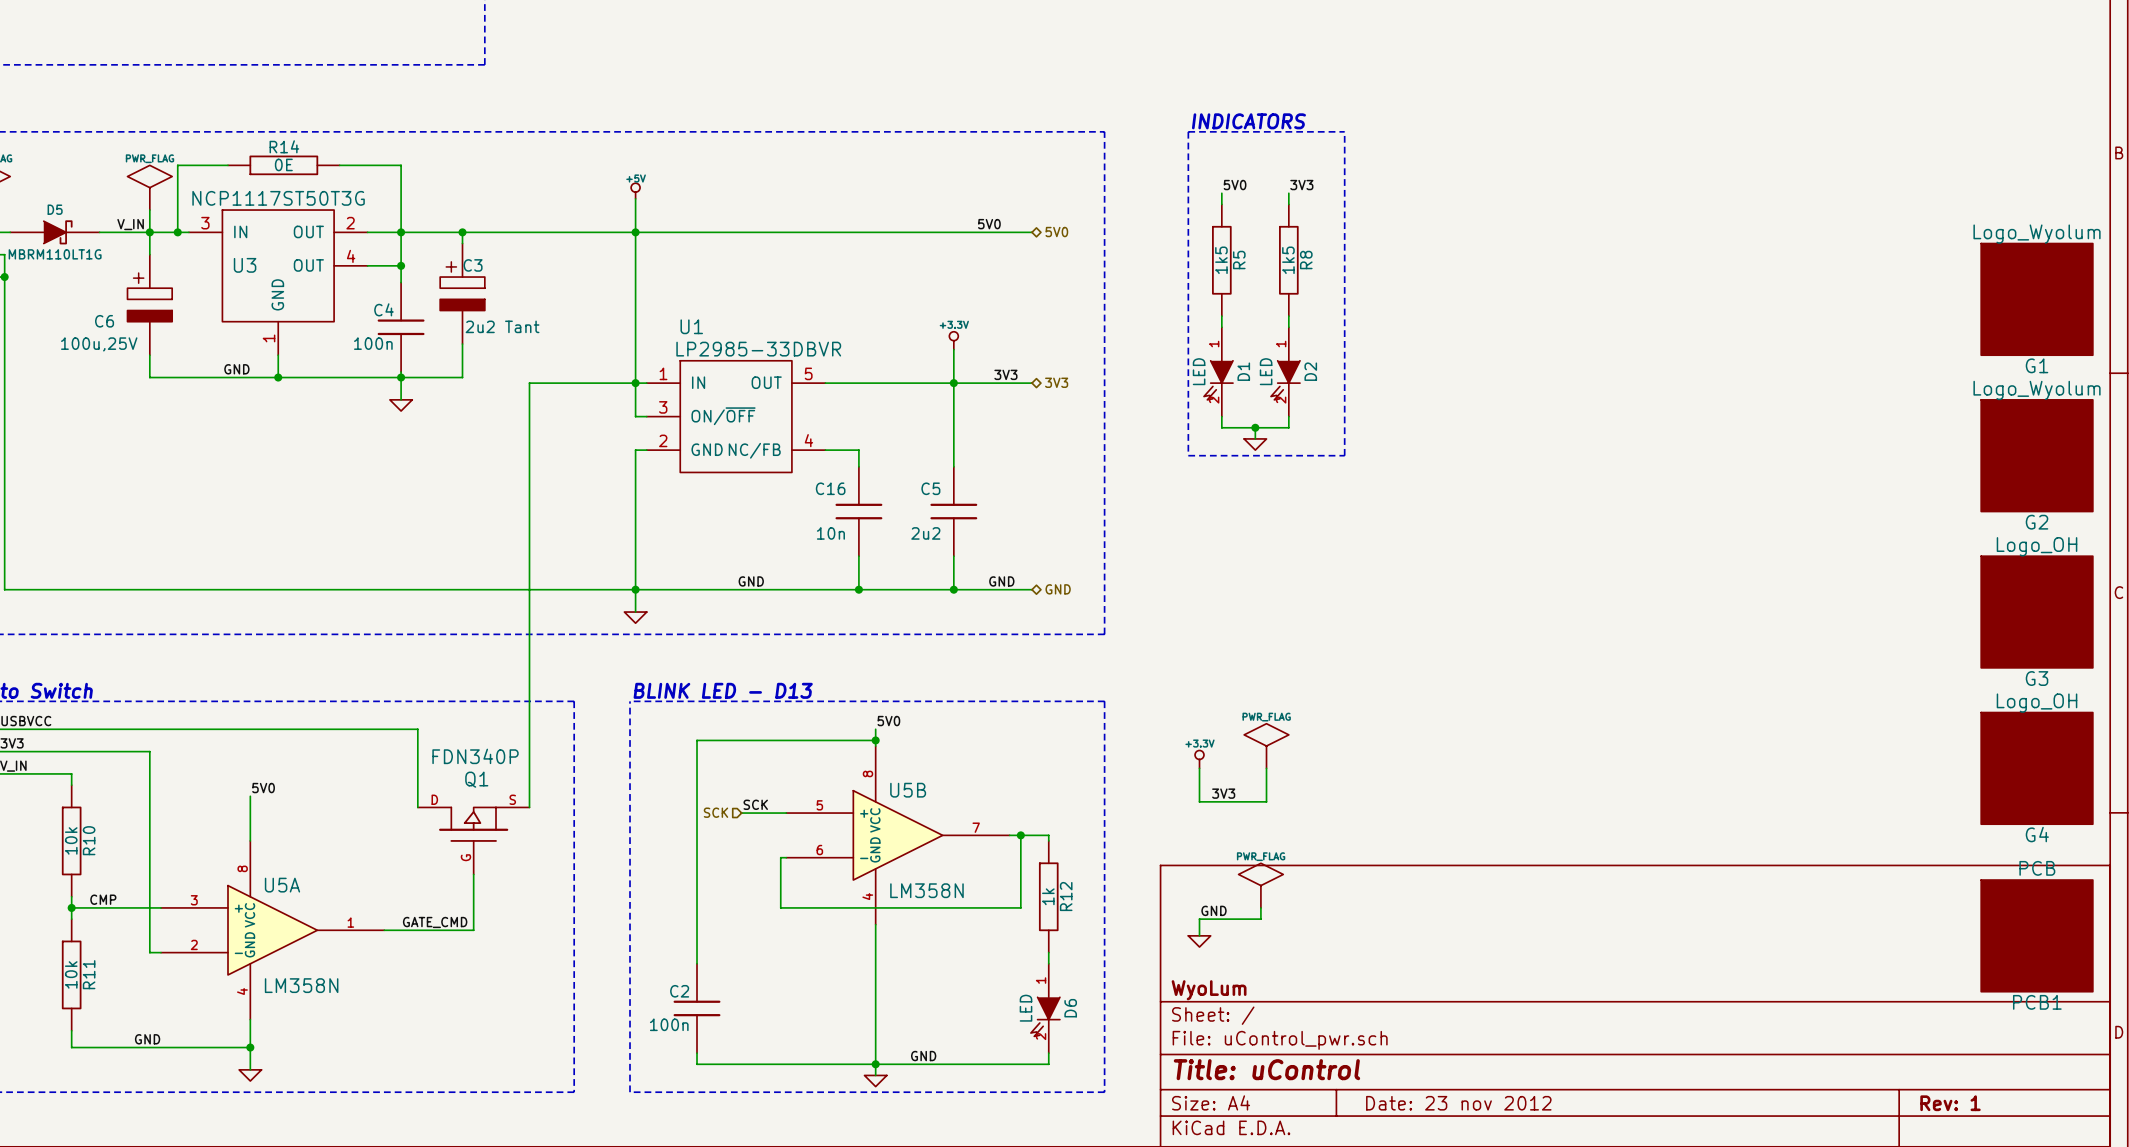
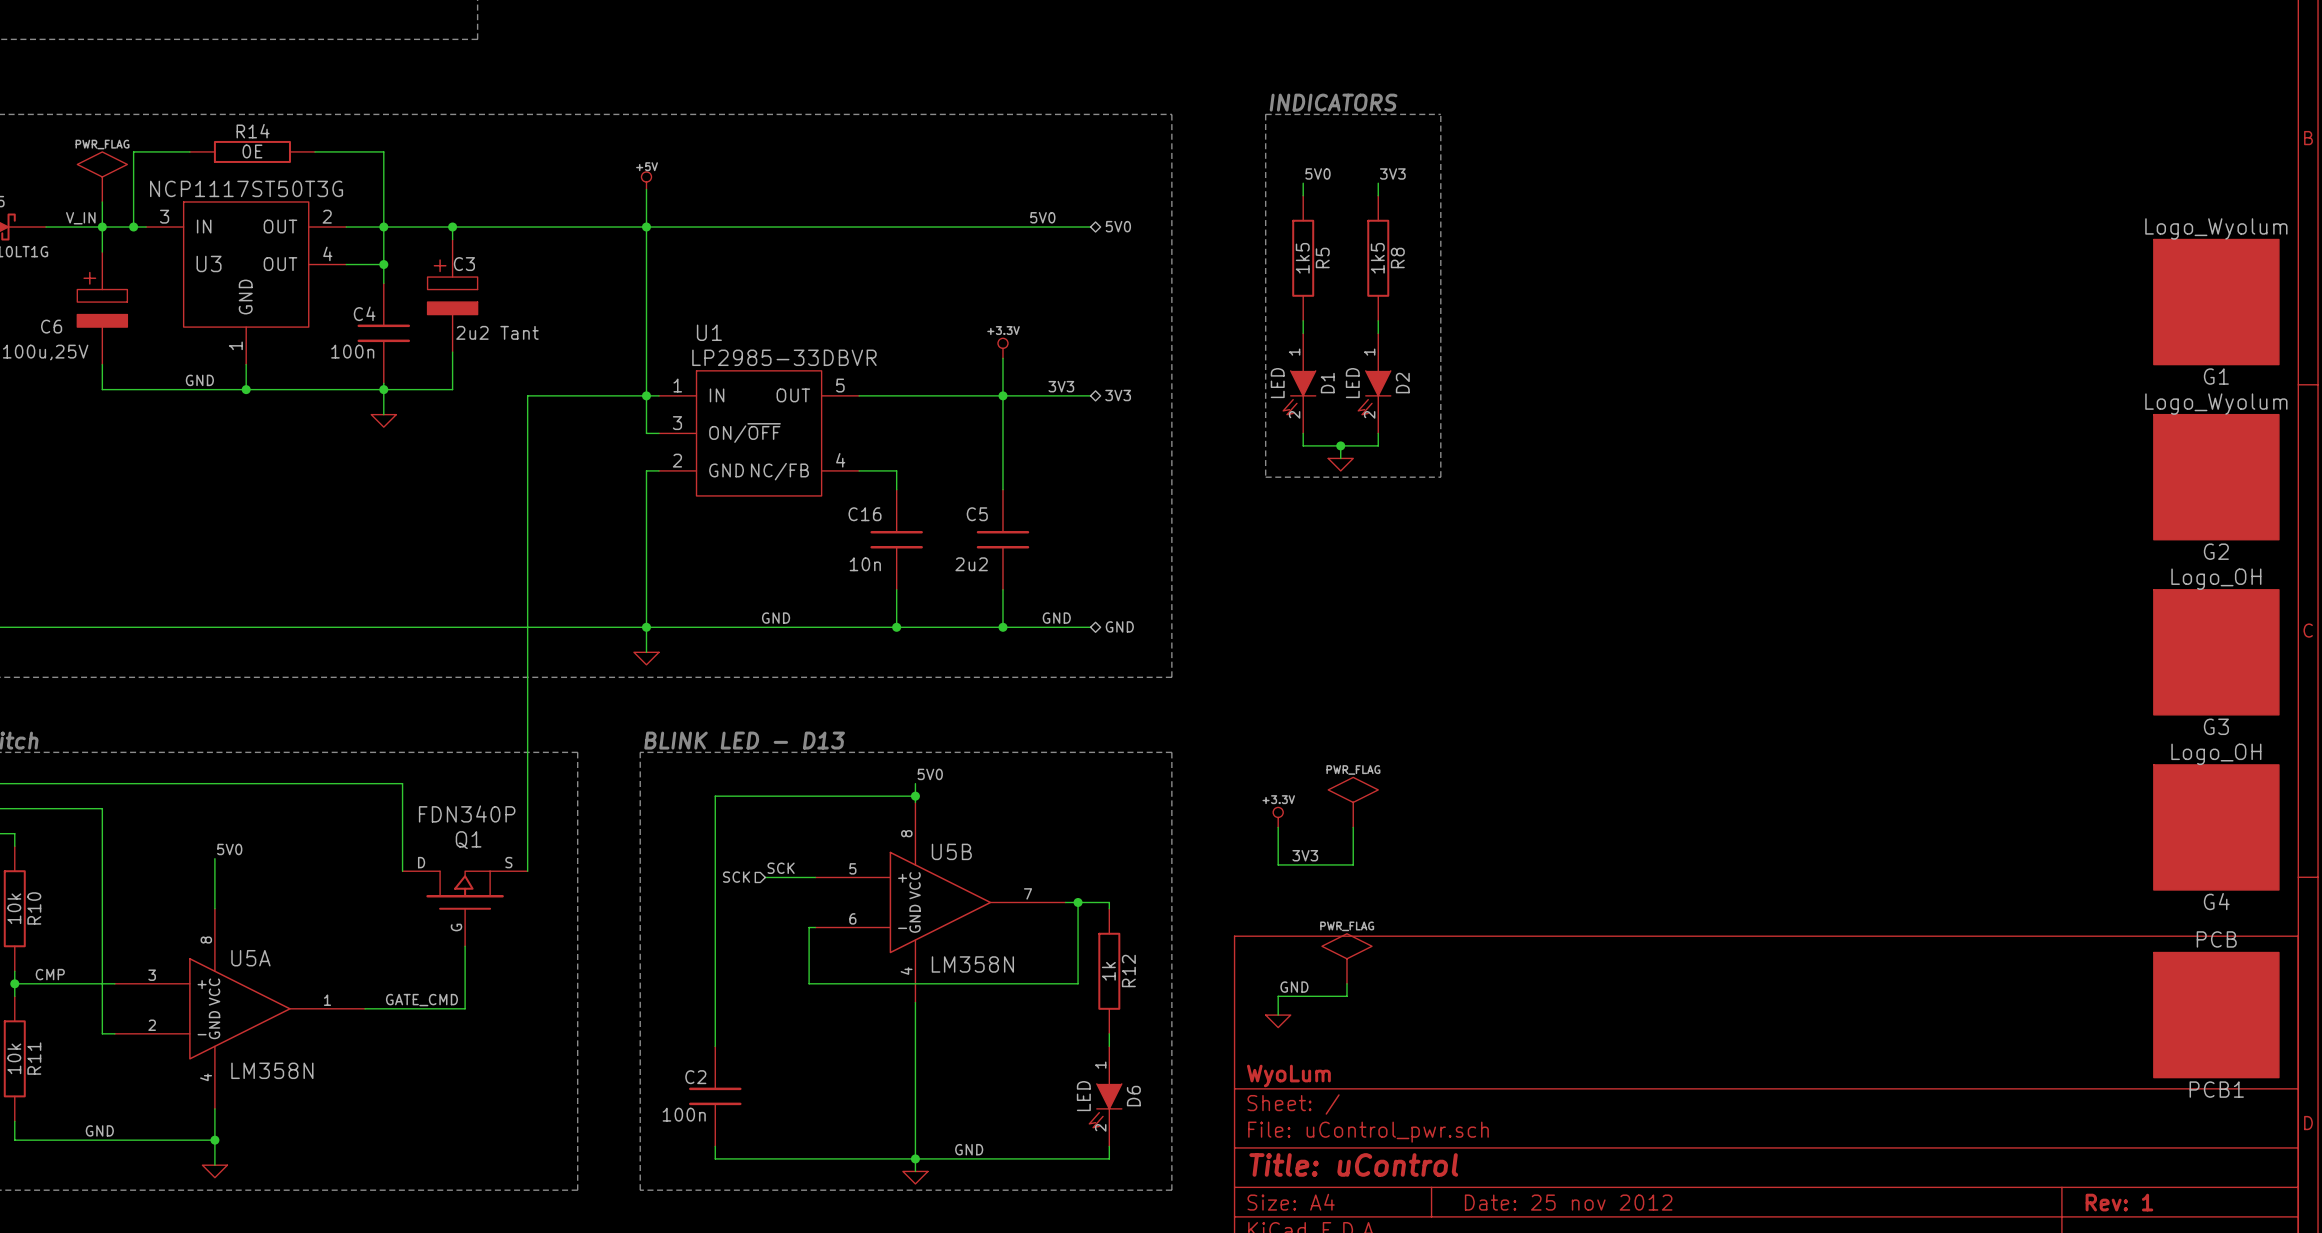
title block: Date: 23 nov 2012 (1458, 1103) -> Date: 25 nov 2012 (1568, 1202)

